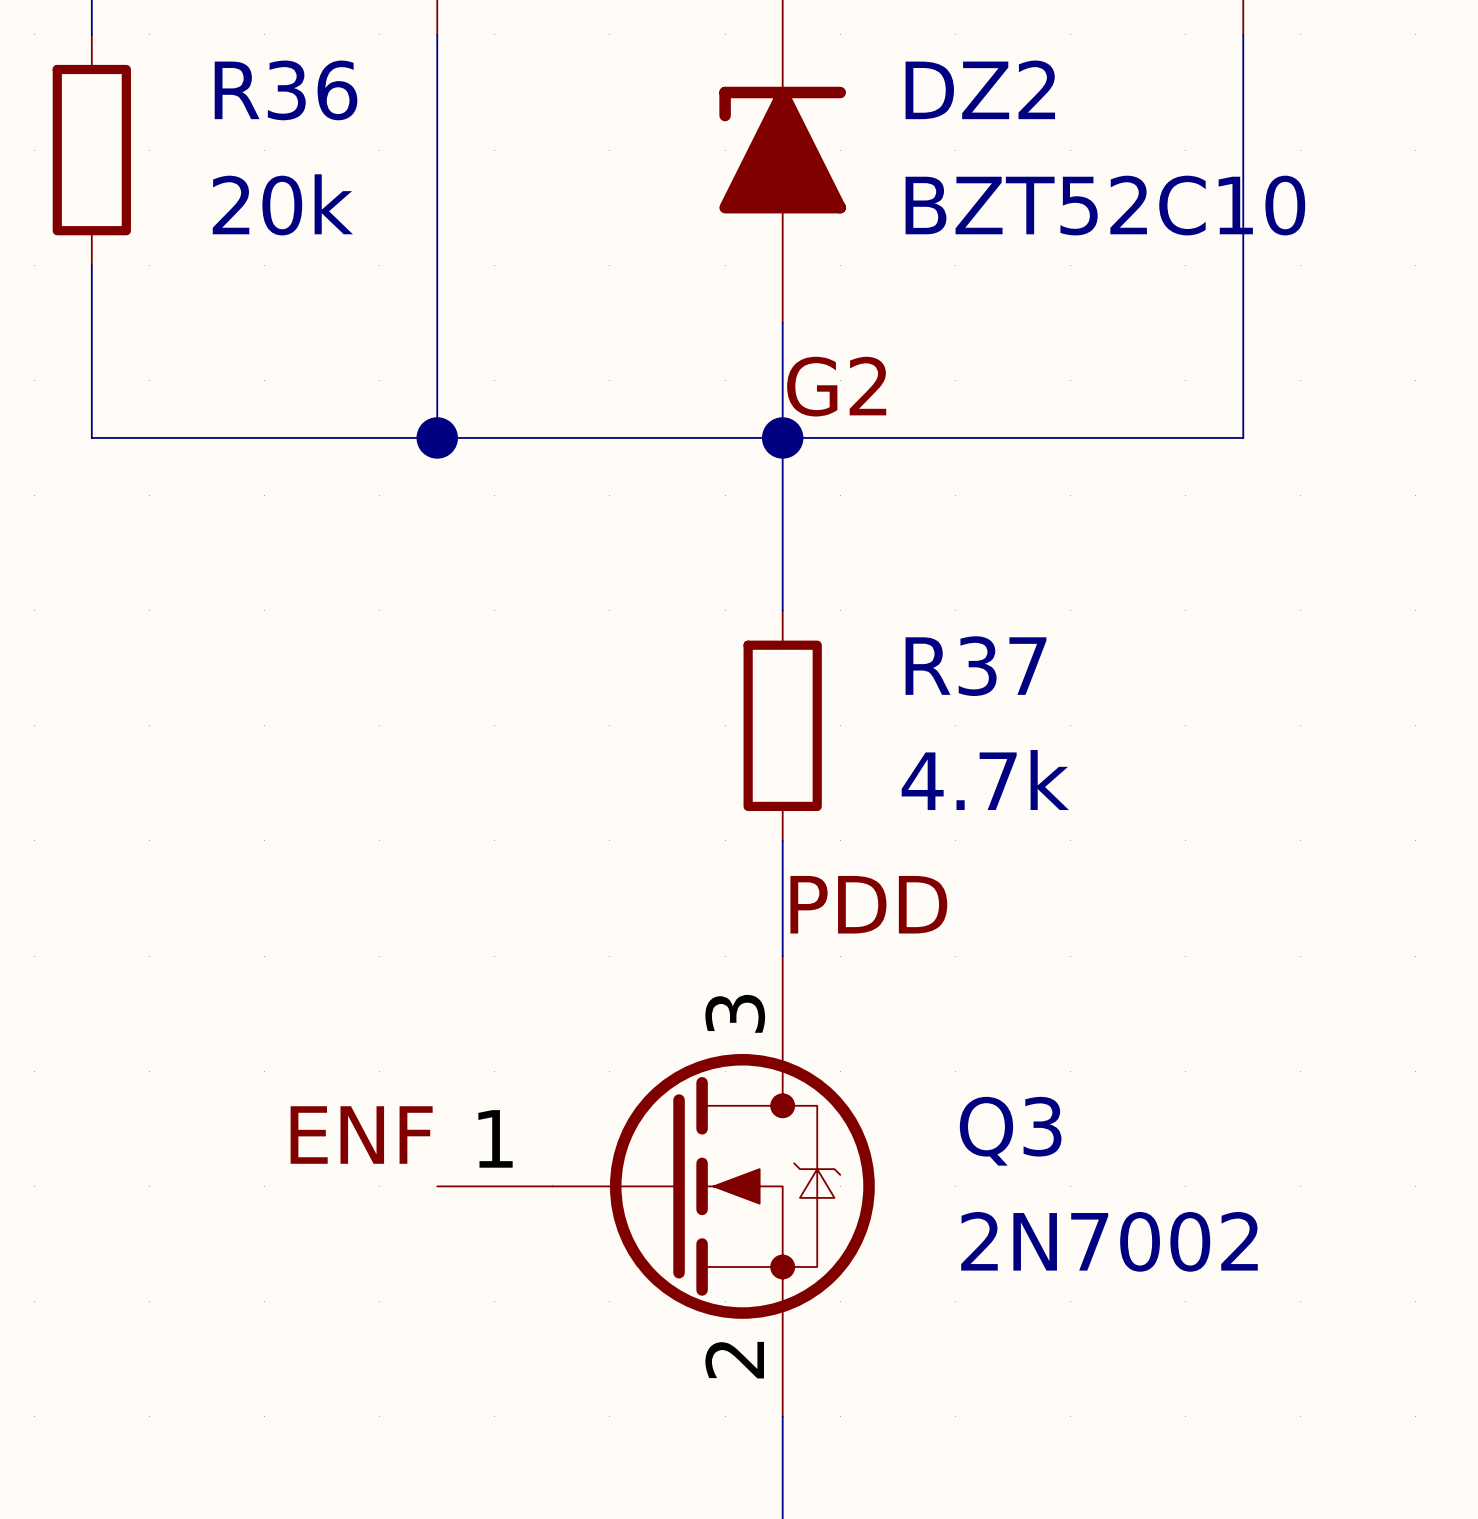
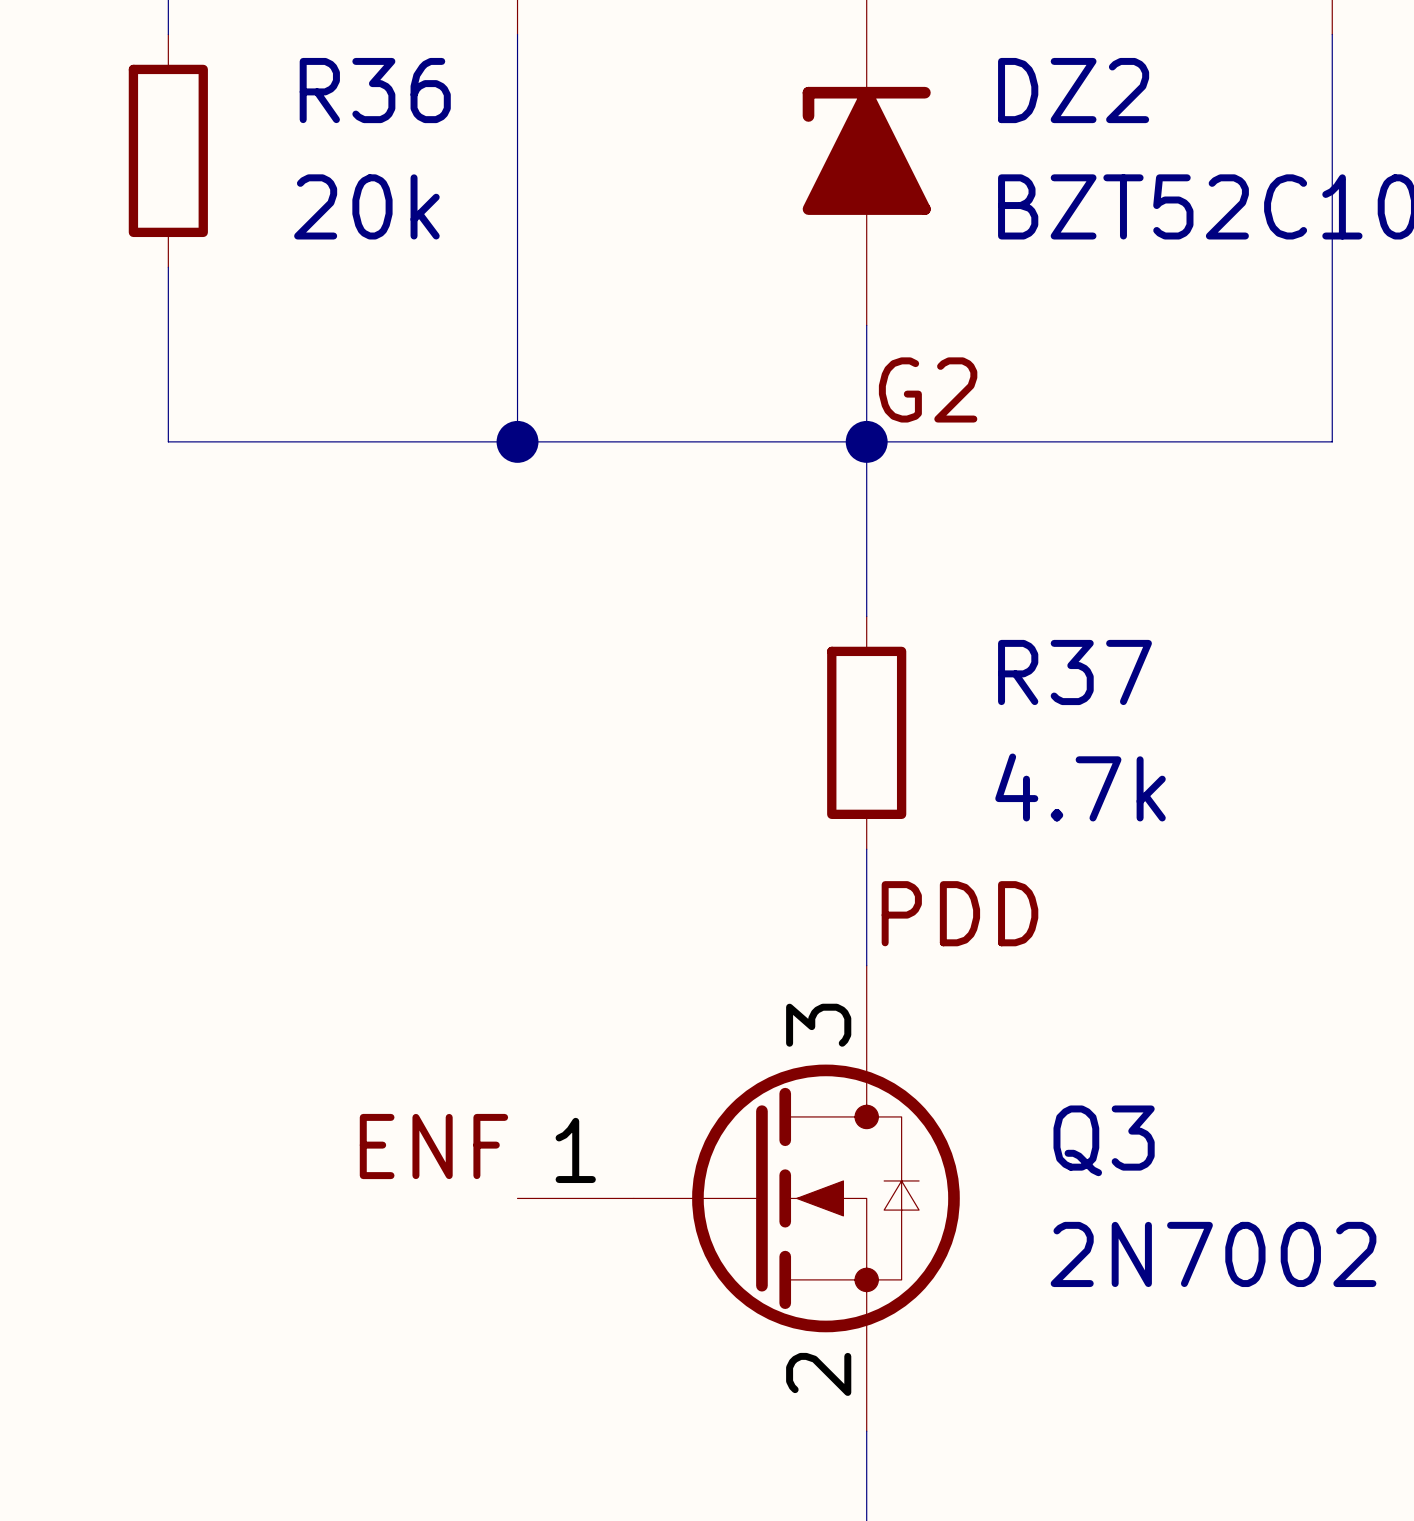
Q3 symbol: [437, 956, 875, 1417] -> [517, 965, 960, 1432]

